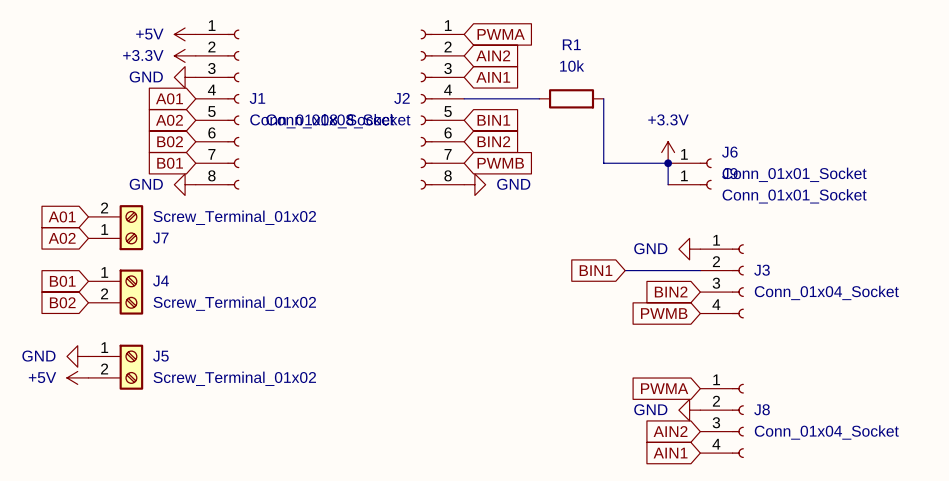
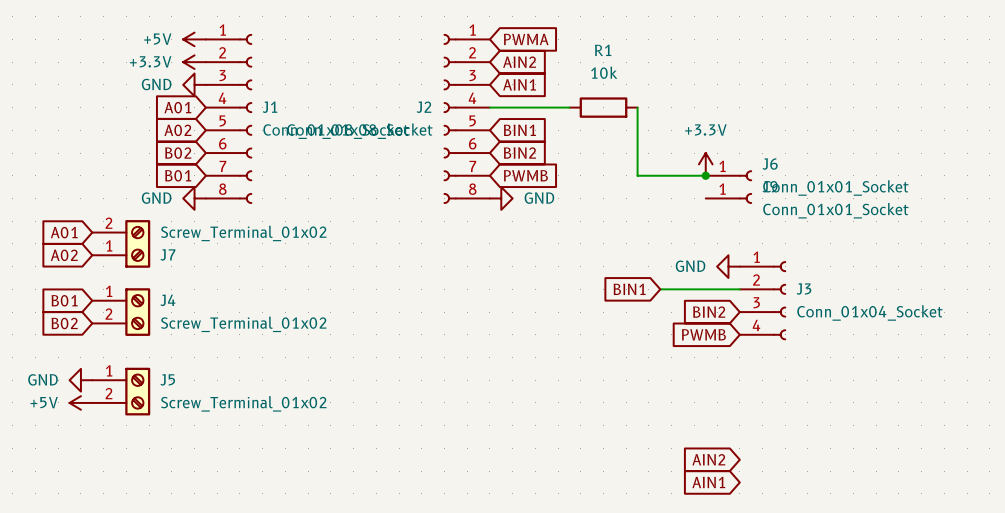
wire: (668, 163) (668, 184) -> none
global label: PWMA (664, 388) -> none
power symbol: GND (689, 410) -> none
J8: Conn_01x04_Socket (722, 420) -> none

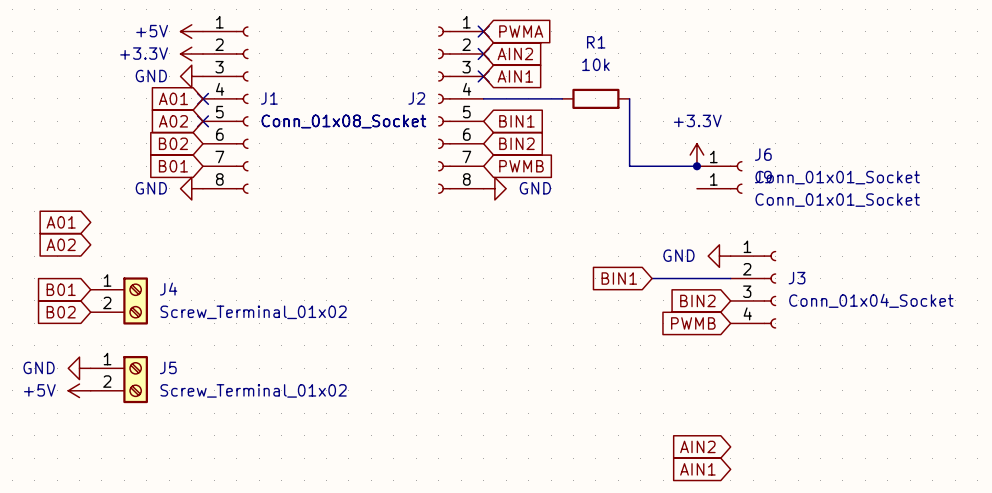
no-connect mark: none -> (483, 31)
no-connect mark: none -> (483, 53)
no-connect mark: none -> (483, 76)
no-connect mark: none -> (202, 98)
no-connect mark: none -> (202, 121)
J7: Screw_Terminal_01x02 (121, 243) -> none

